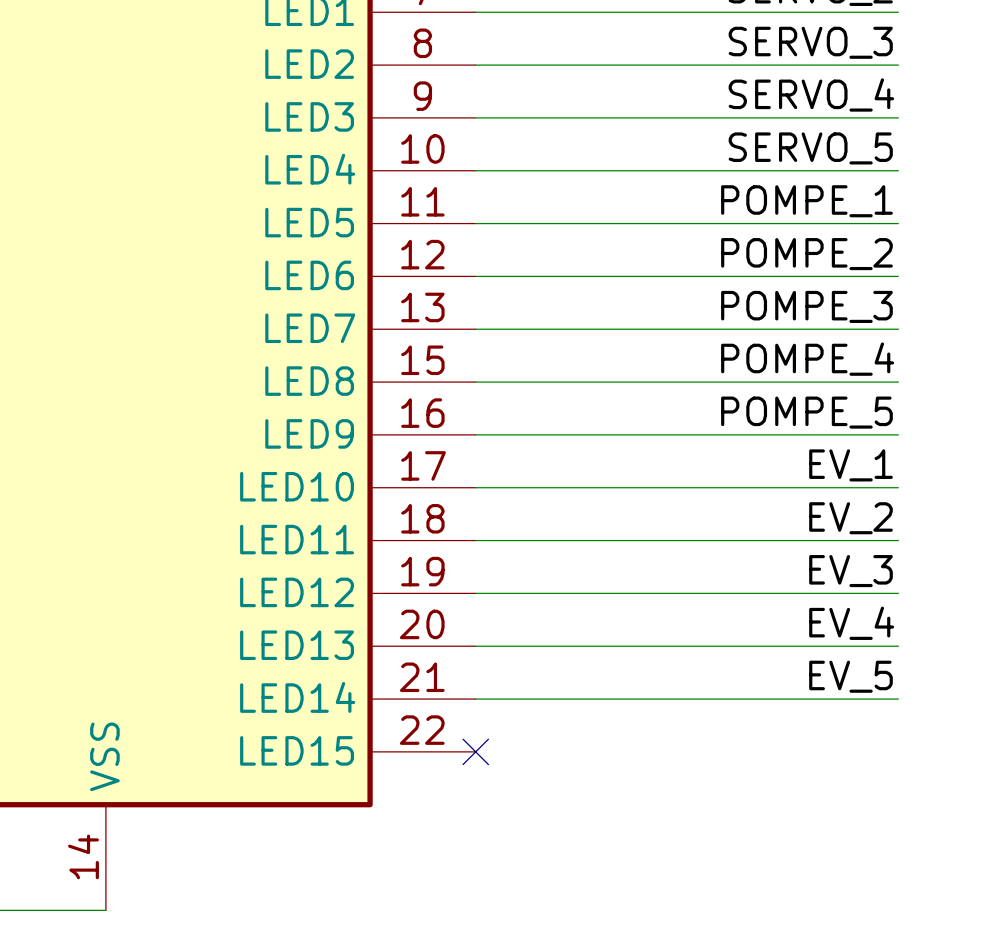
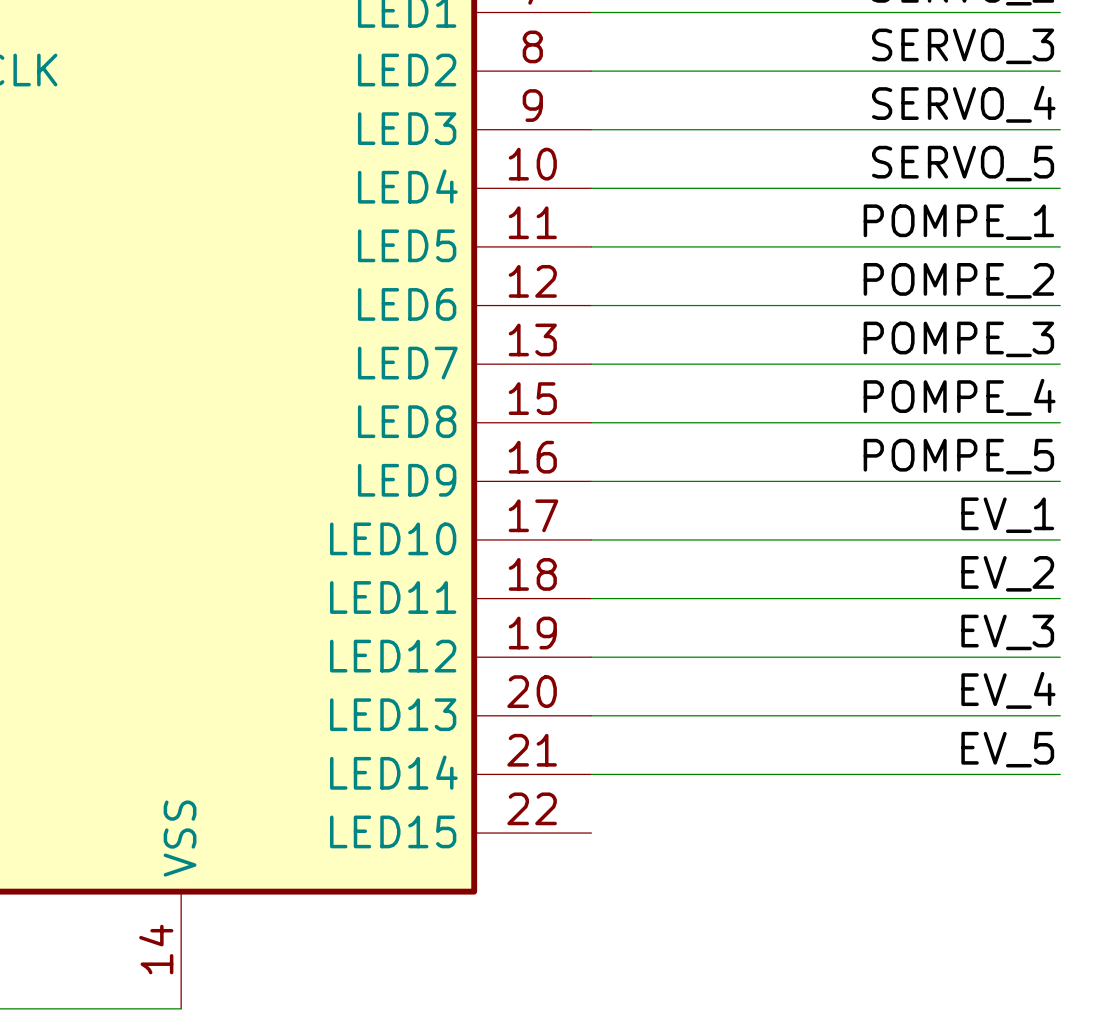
no-connect mark: (475, 751) -> none

